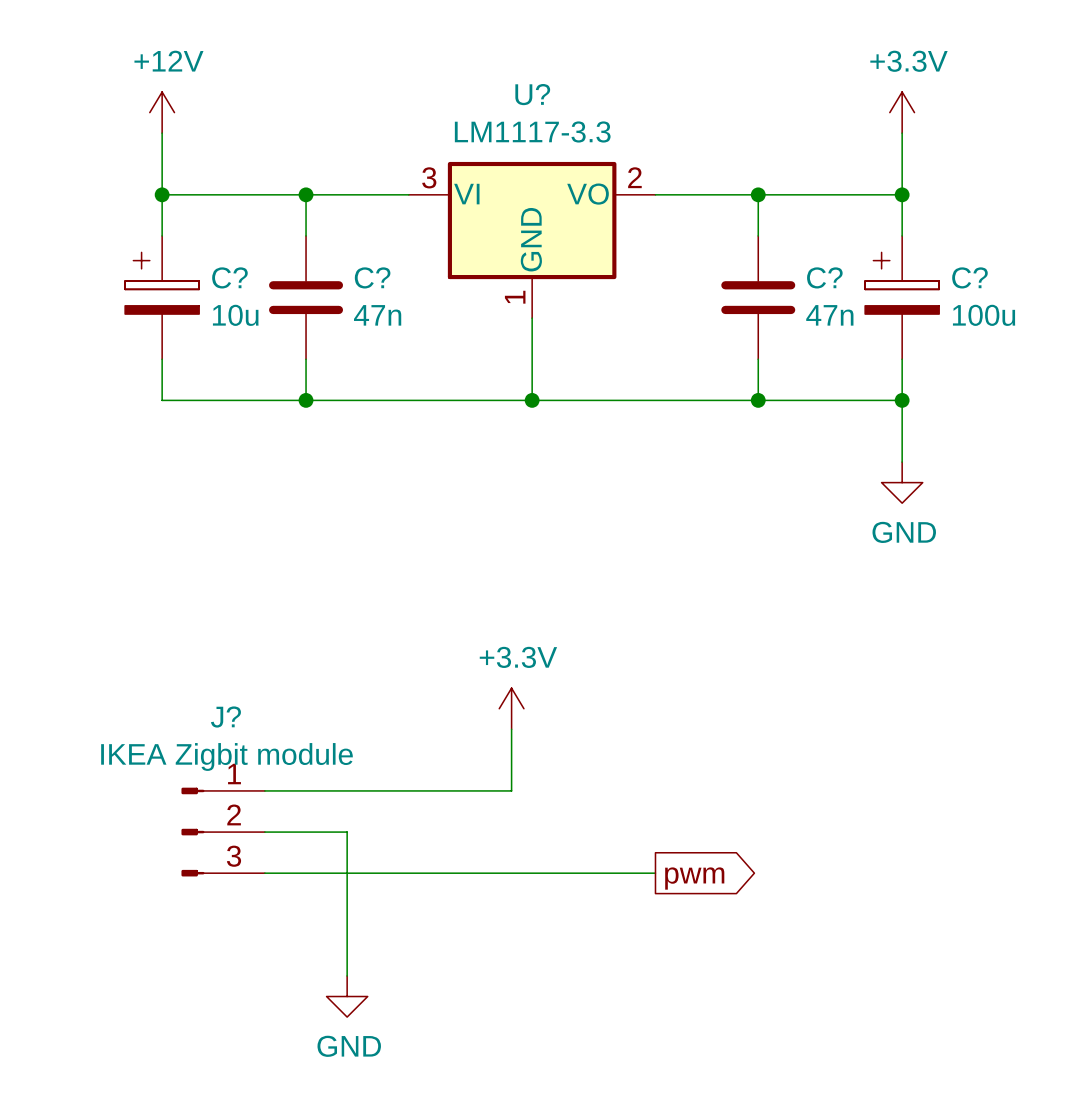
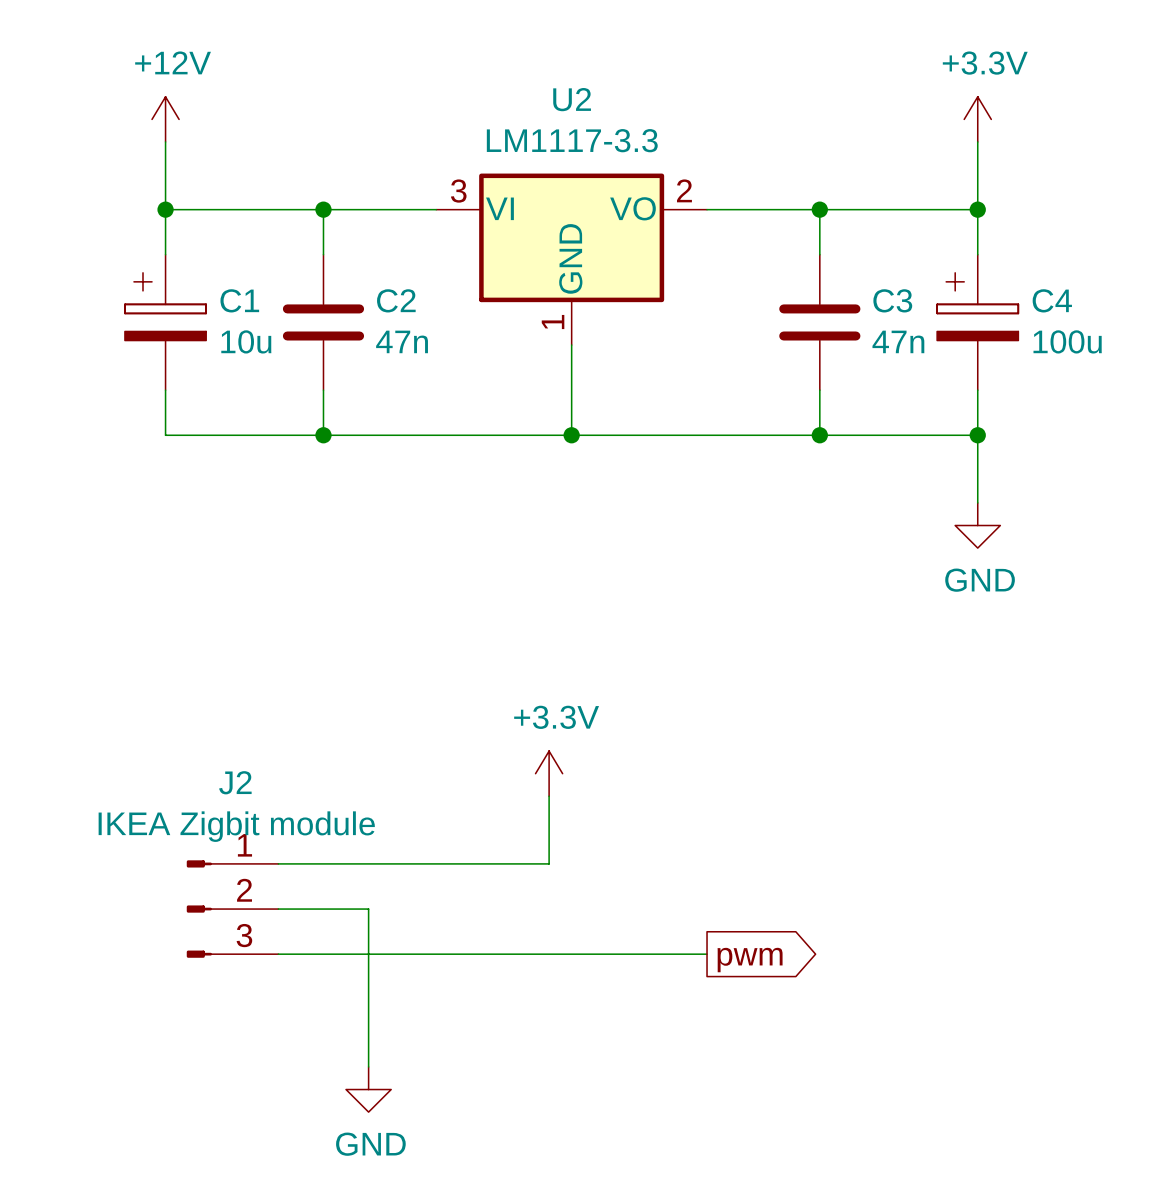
U? name: U? (532, 94) -> U2 (572, 99)
C? name: C? (229, 277) -> C1 (239, 300)
C? name: C? (372, 277) -> C2 (396, 300)
C? name: C? (824, 277) -> C3 (892, 300)
C? name: C? (969, 277) -> C4 (1052, 300)
J? name: J? (225, 717) -> J2 (235, 782)

